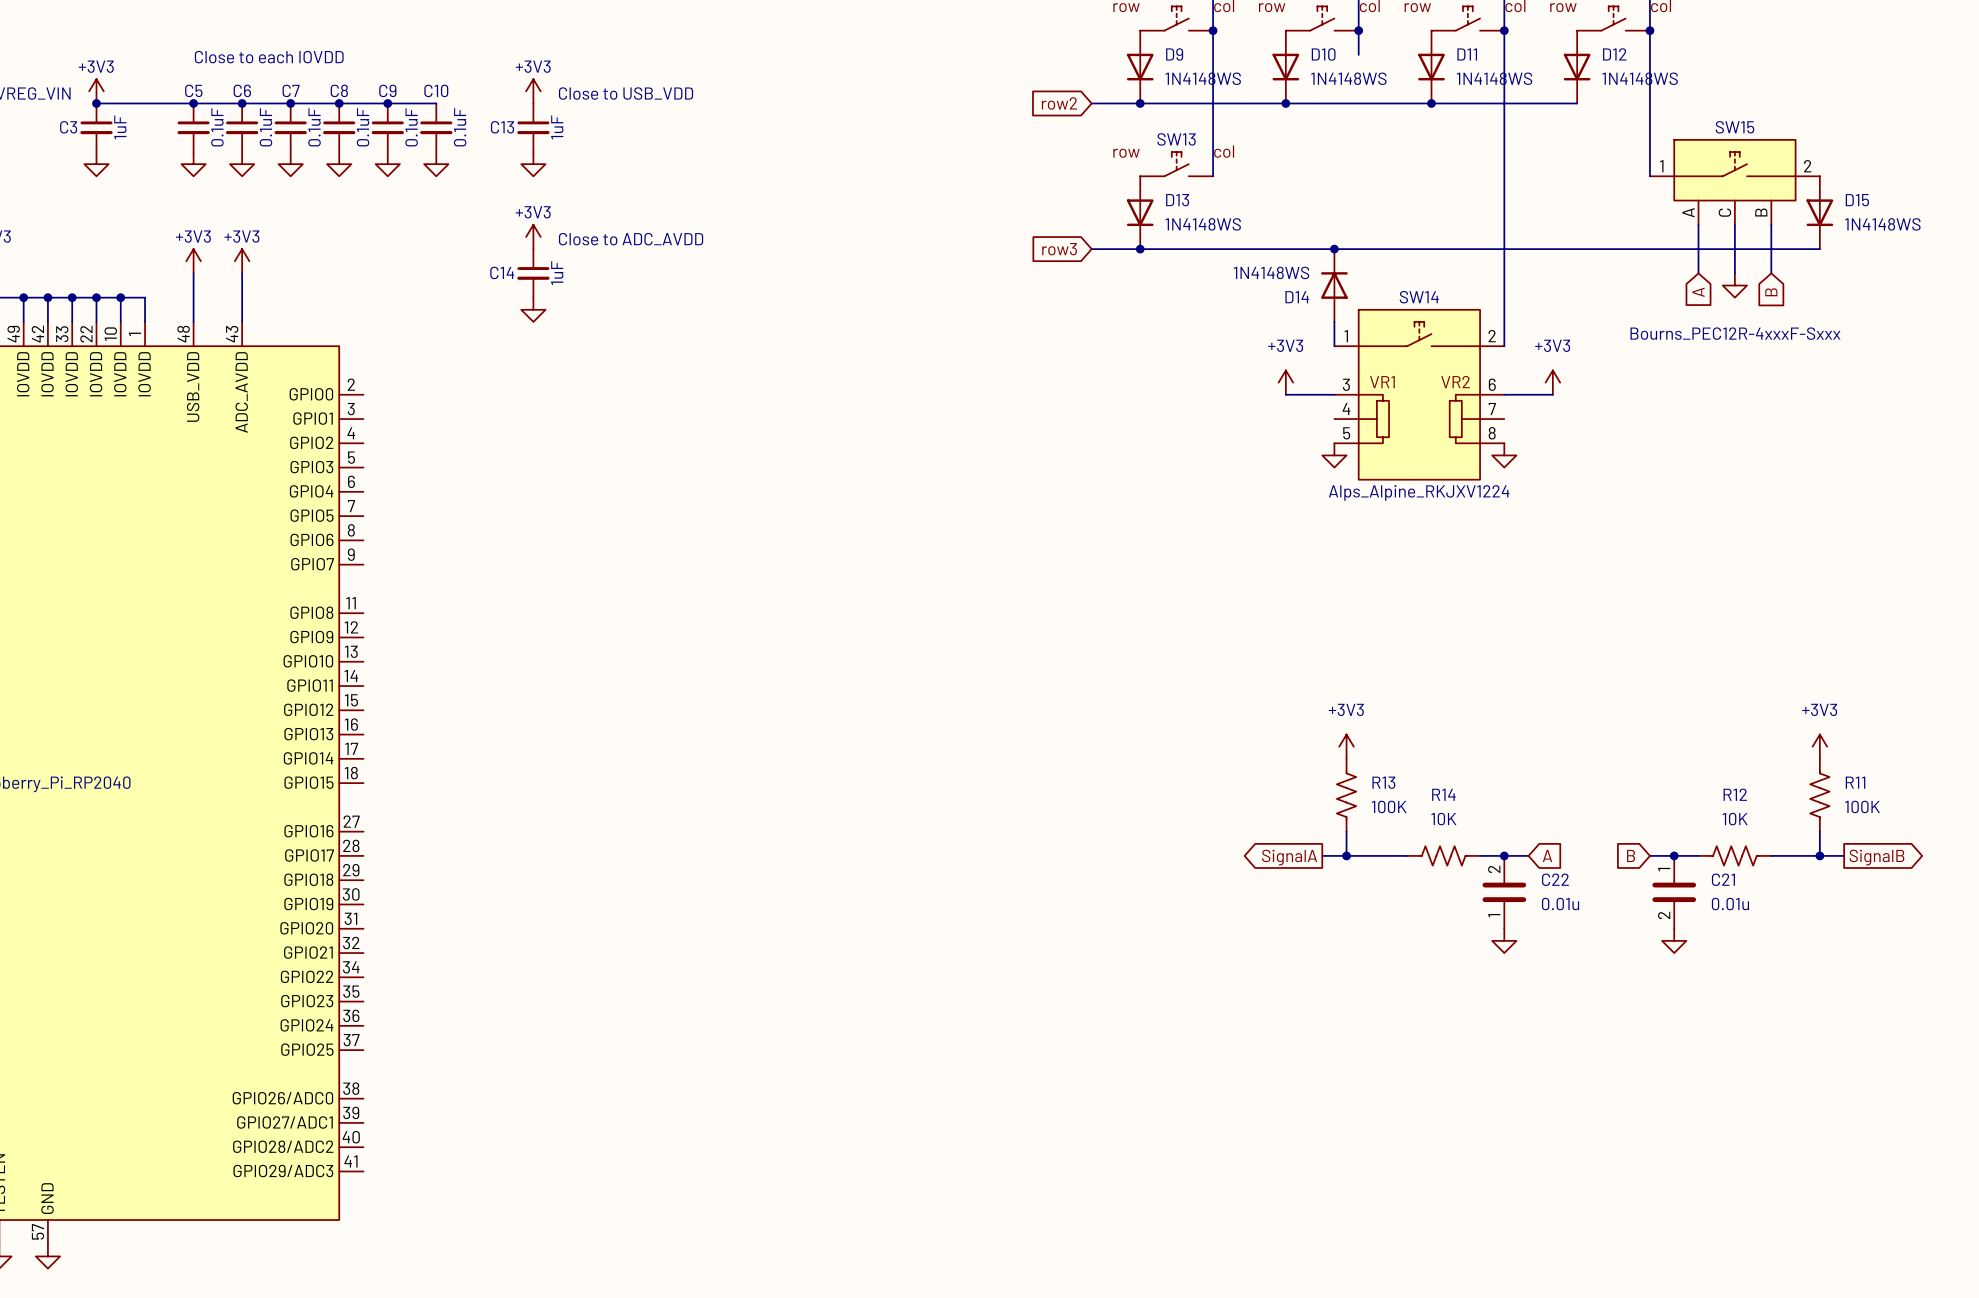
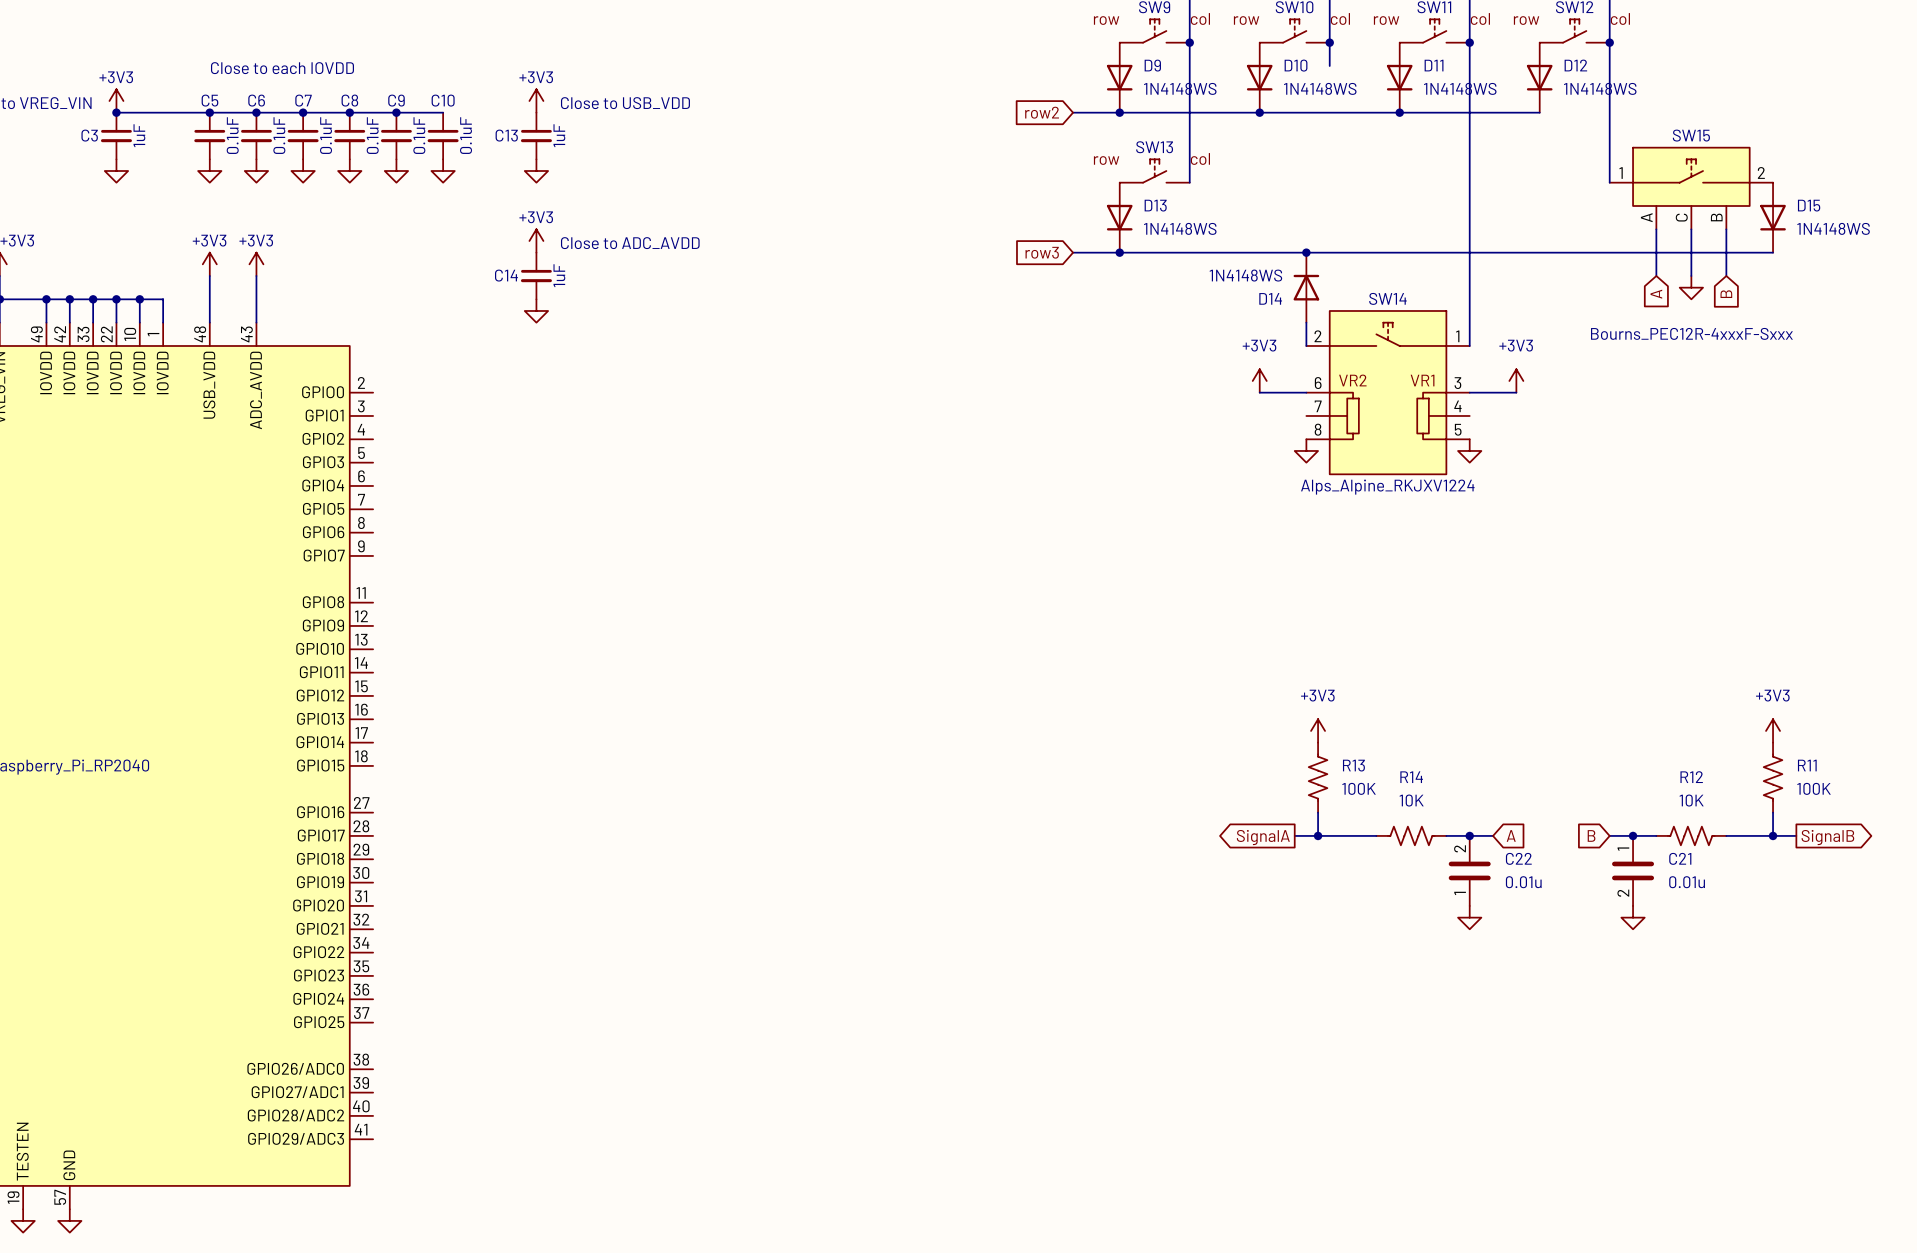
SW14 flip: as is (1419, 394) -> left-right (1388, 392)

